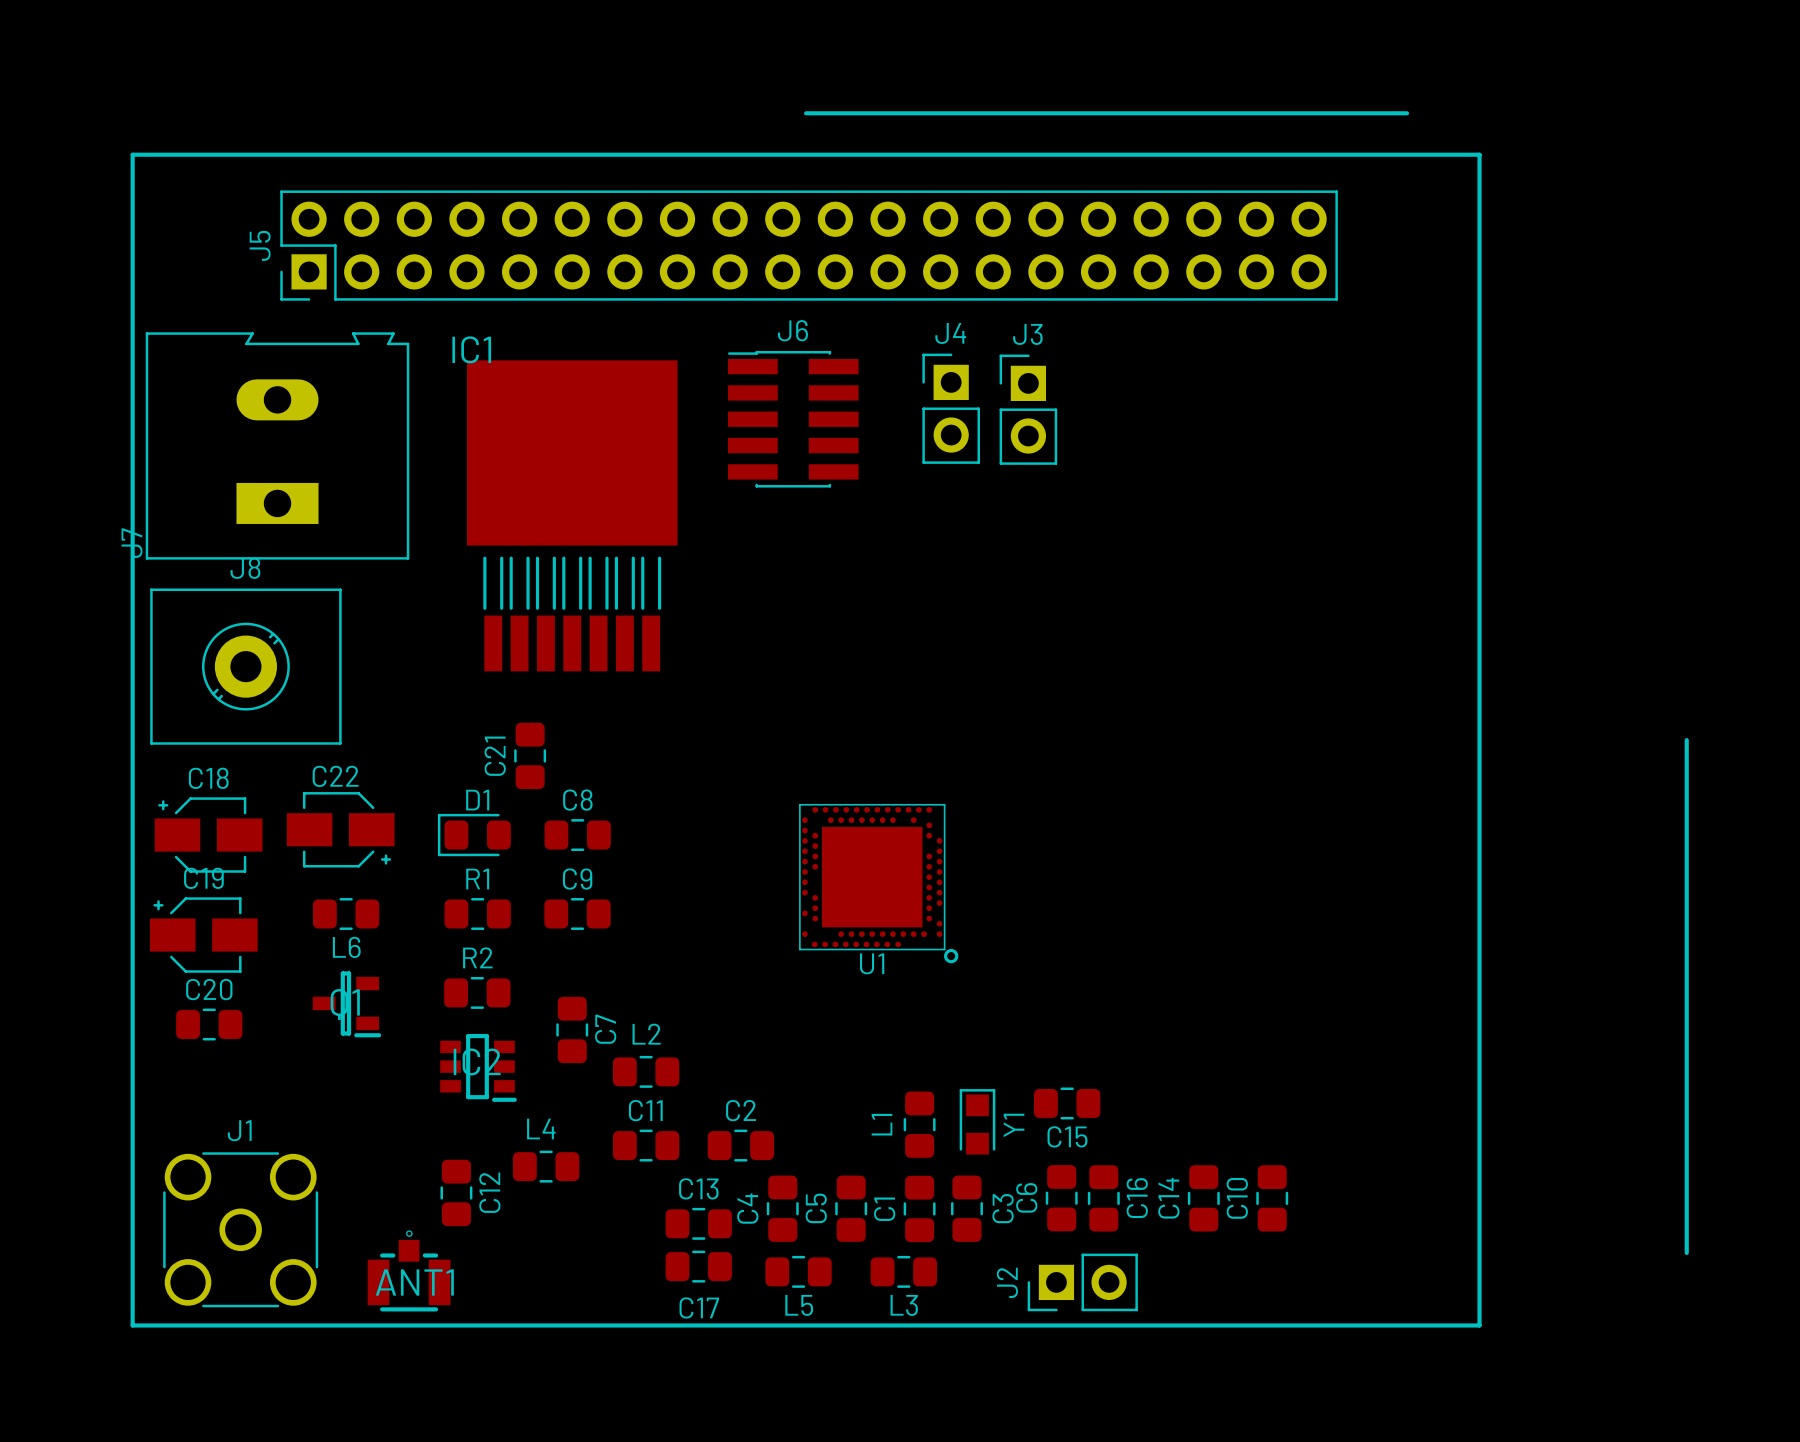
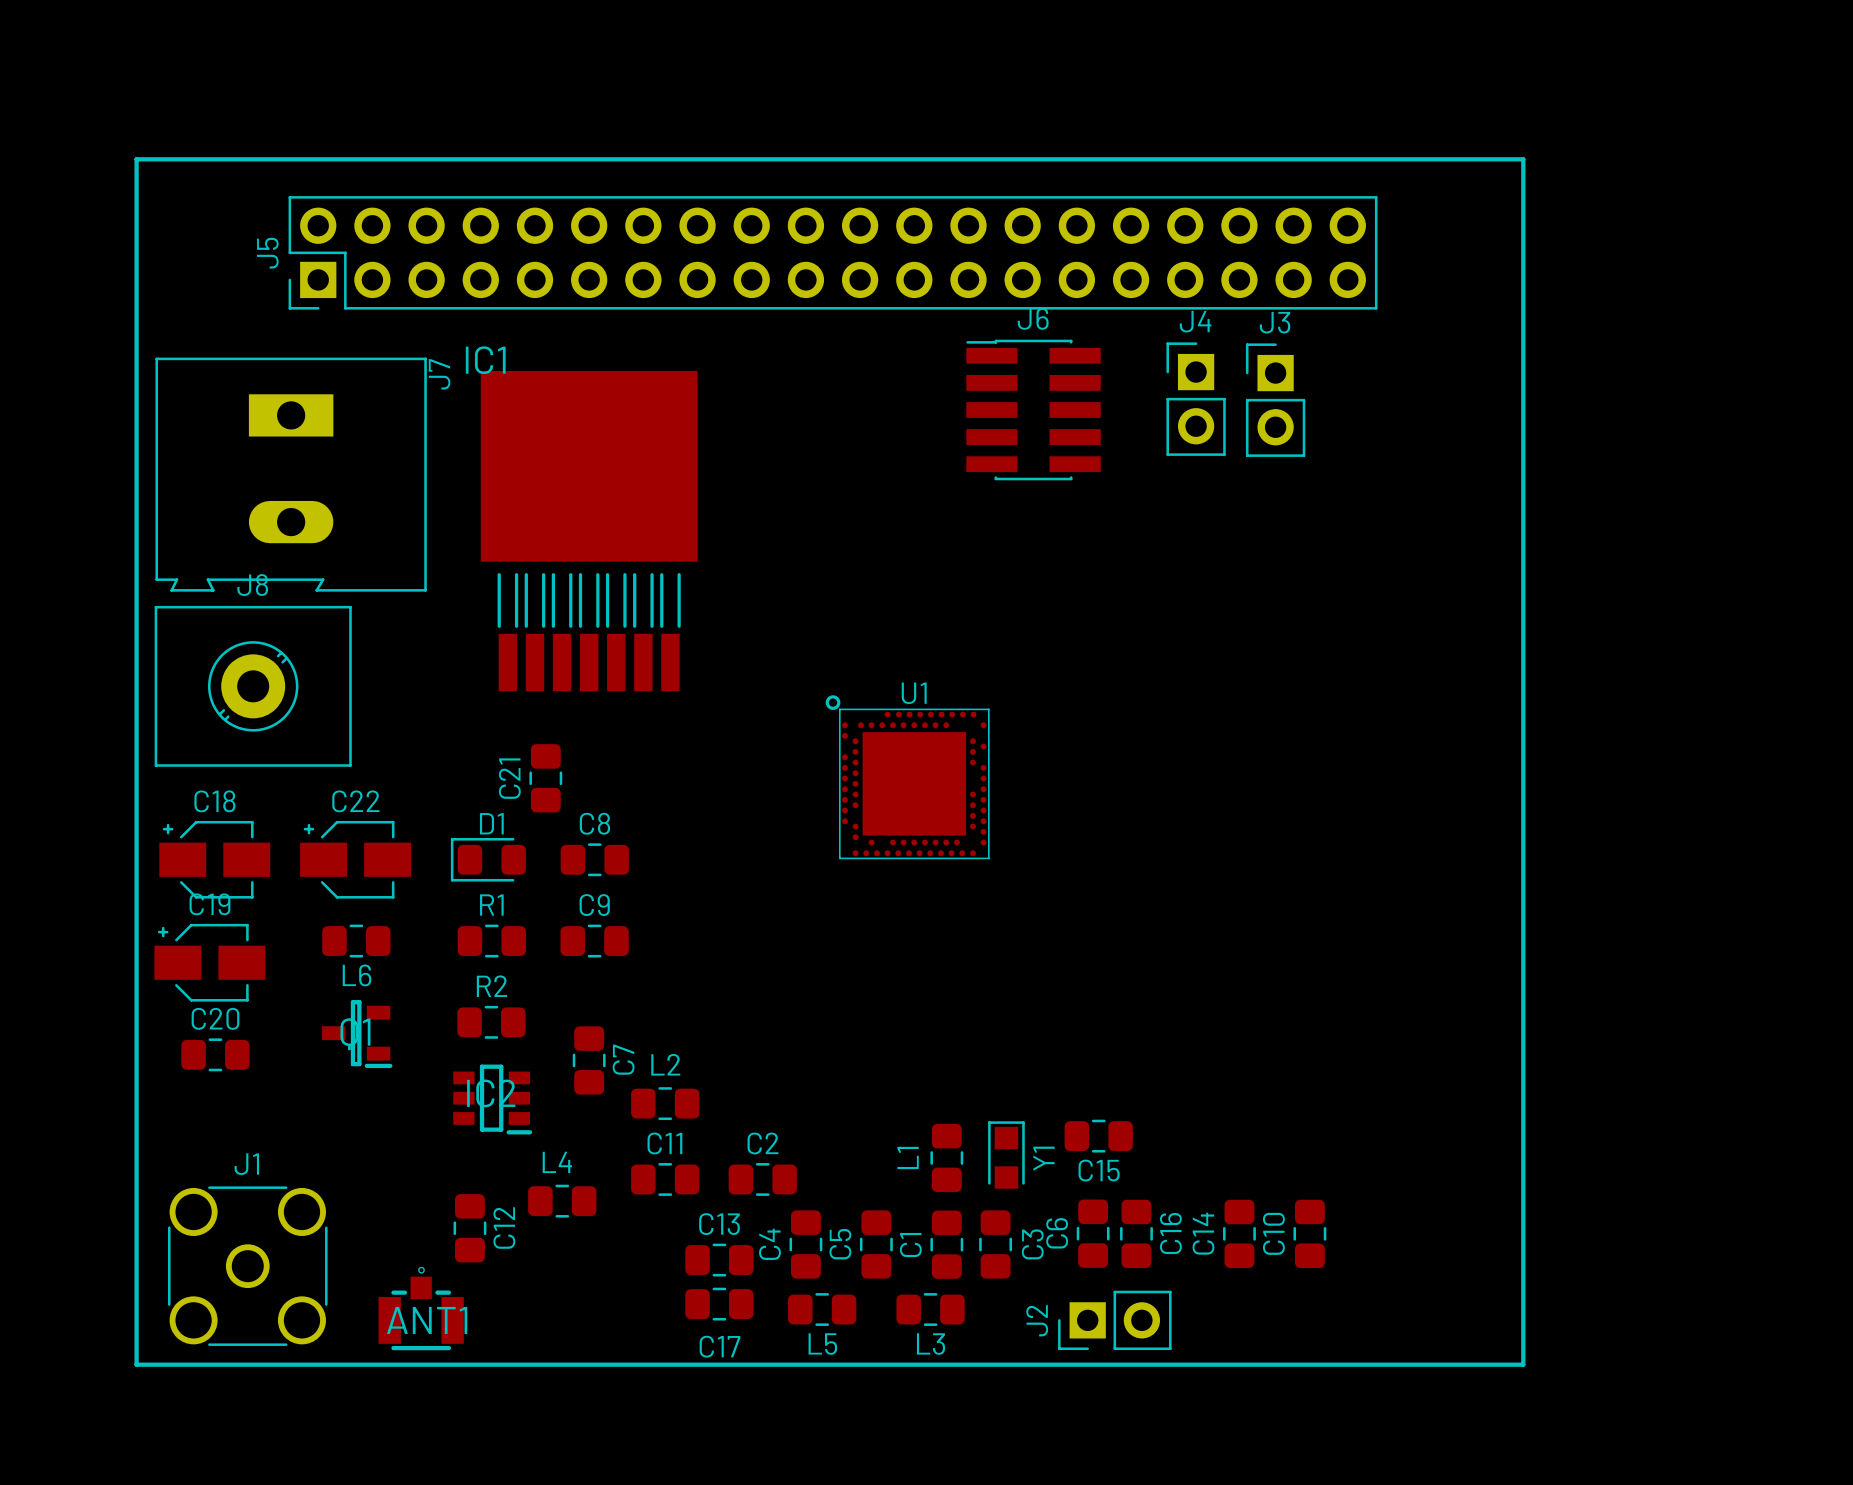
line: (806, 113) (1407, 113) -> none
J4 position: (951, 408) -> (1196, 399)
J3 position: (1028, 409) -> (1275, 400)
J6 position: (793, 419) -> (1033, 409)
J7 rotation: 0° (277, 445) -> 180° (291, 474)
line: (1686, 740) (1686, 1252) -> none
C22 rotation: 0° (340, 829) -> 180° (355, 859)
U1 rotation: 0° (879, 883) -> 180° (907, 776)
U1 position: (879, 883) -> (907, 776)

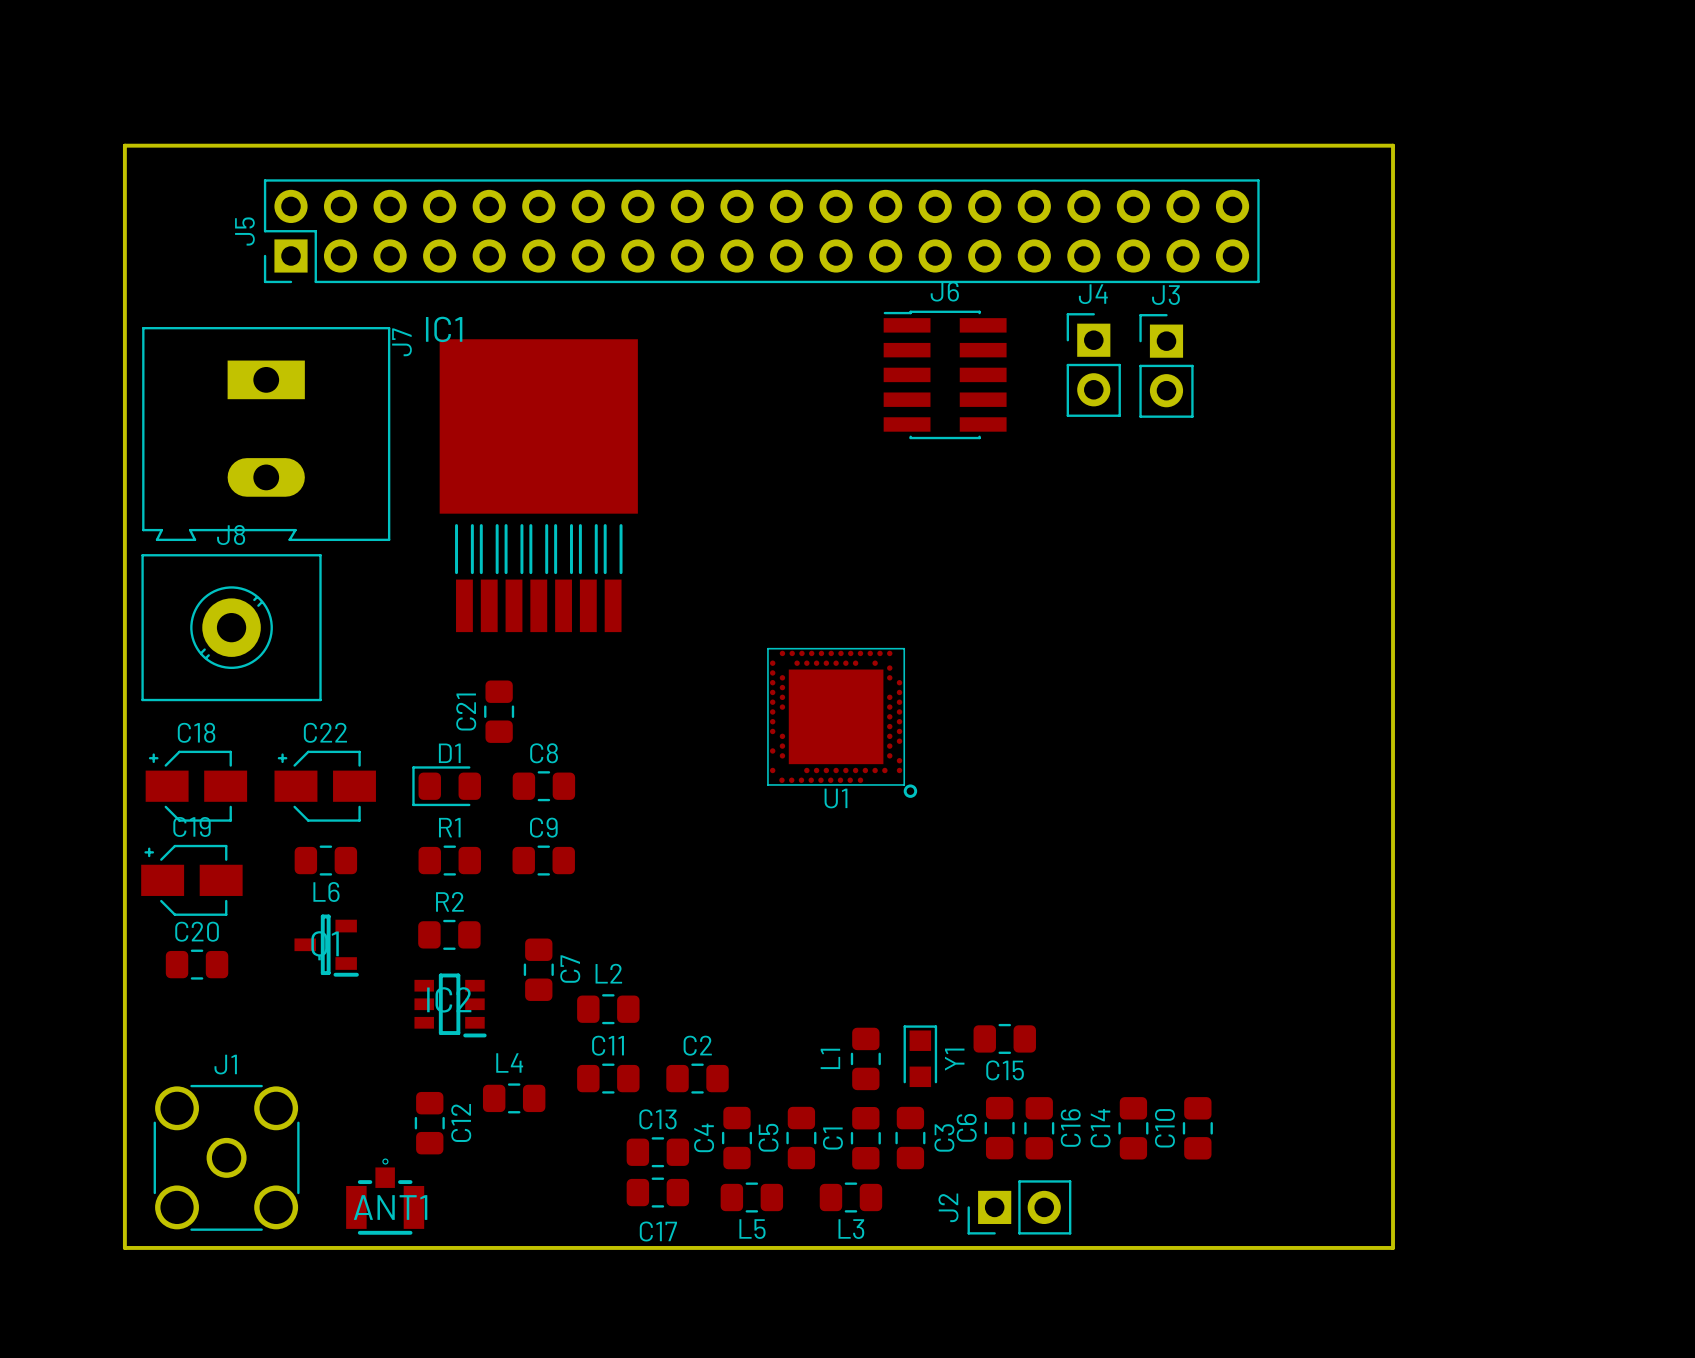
line: (136, 159) (1523, 159) (1523, 1364) (136, 1364) (136, 159) -> none
board edge: none -> (124, 145) (1393, 145) (1393, 1247) (124, 1247) (124, 145)
U1 rotation: 0° (907, 776) -> 180° (842, 723)

